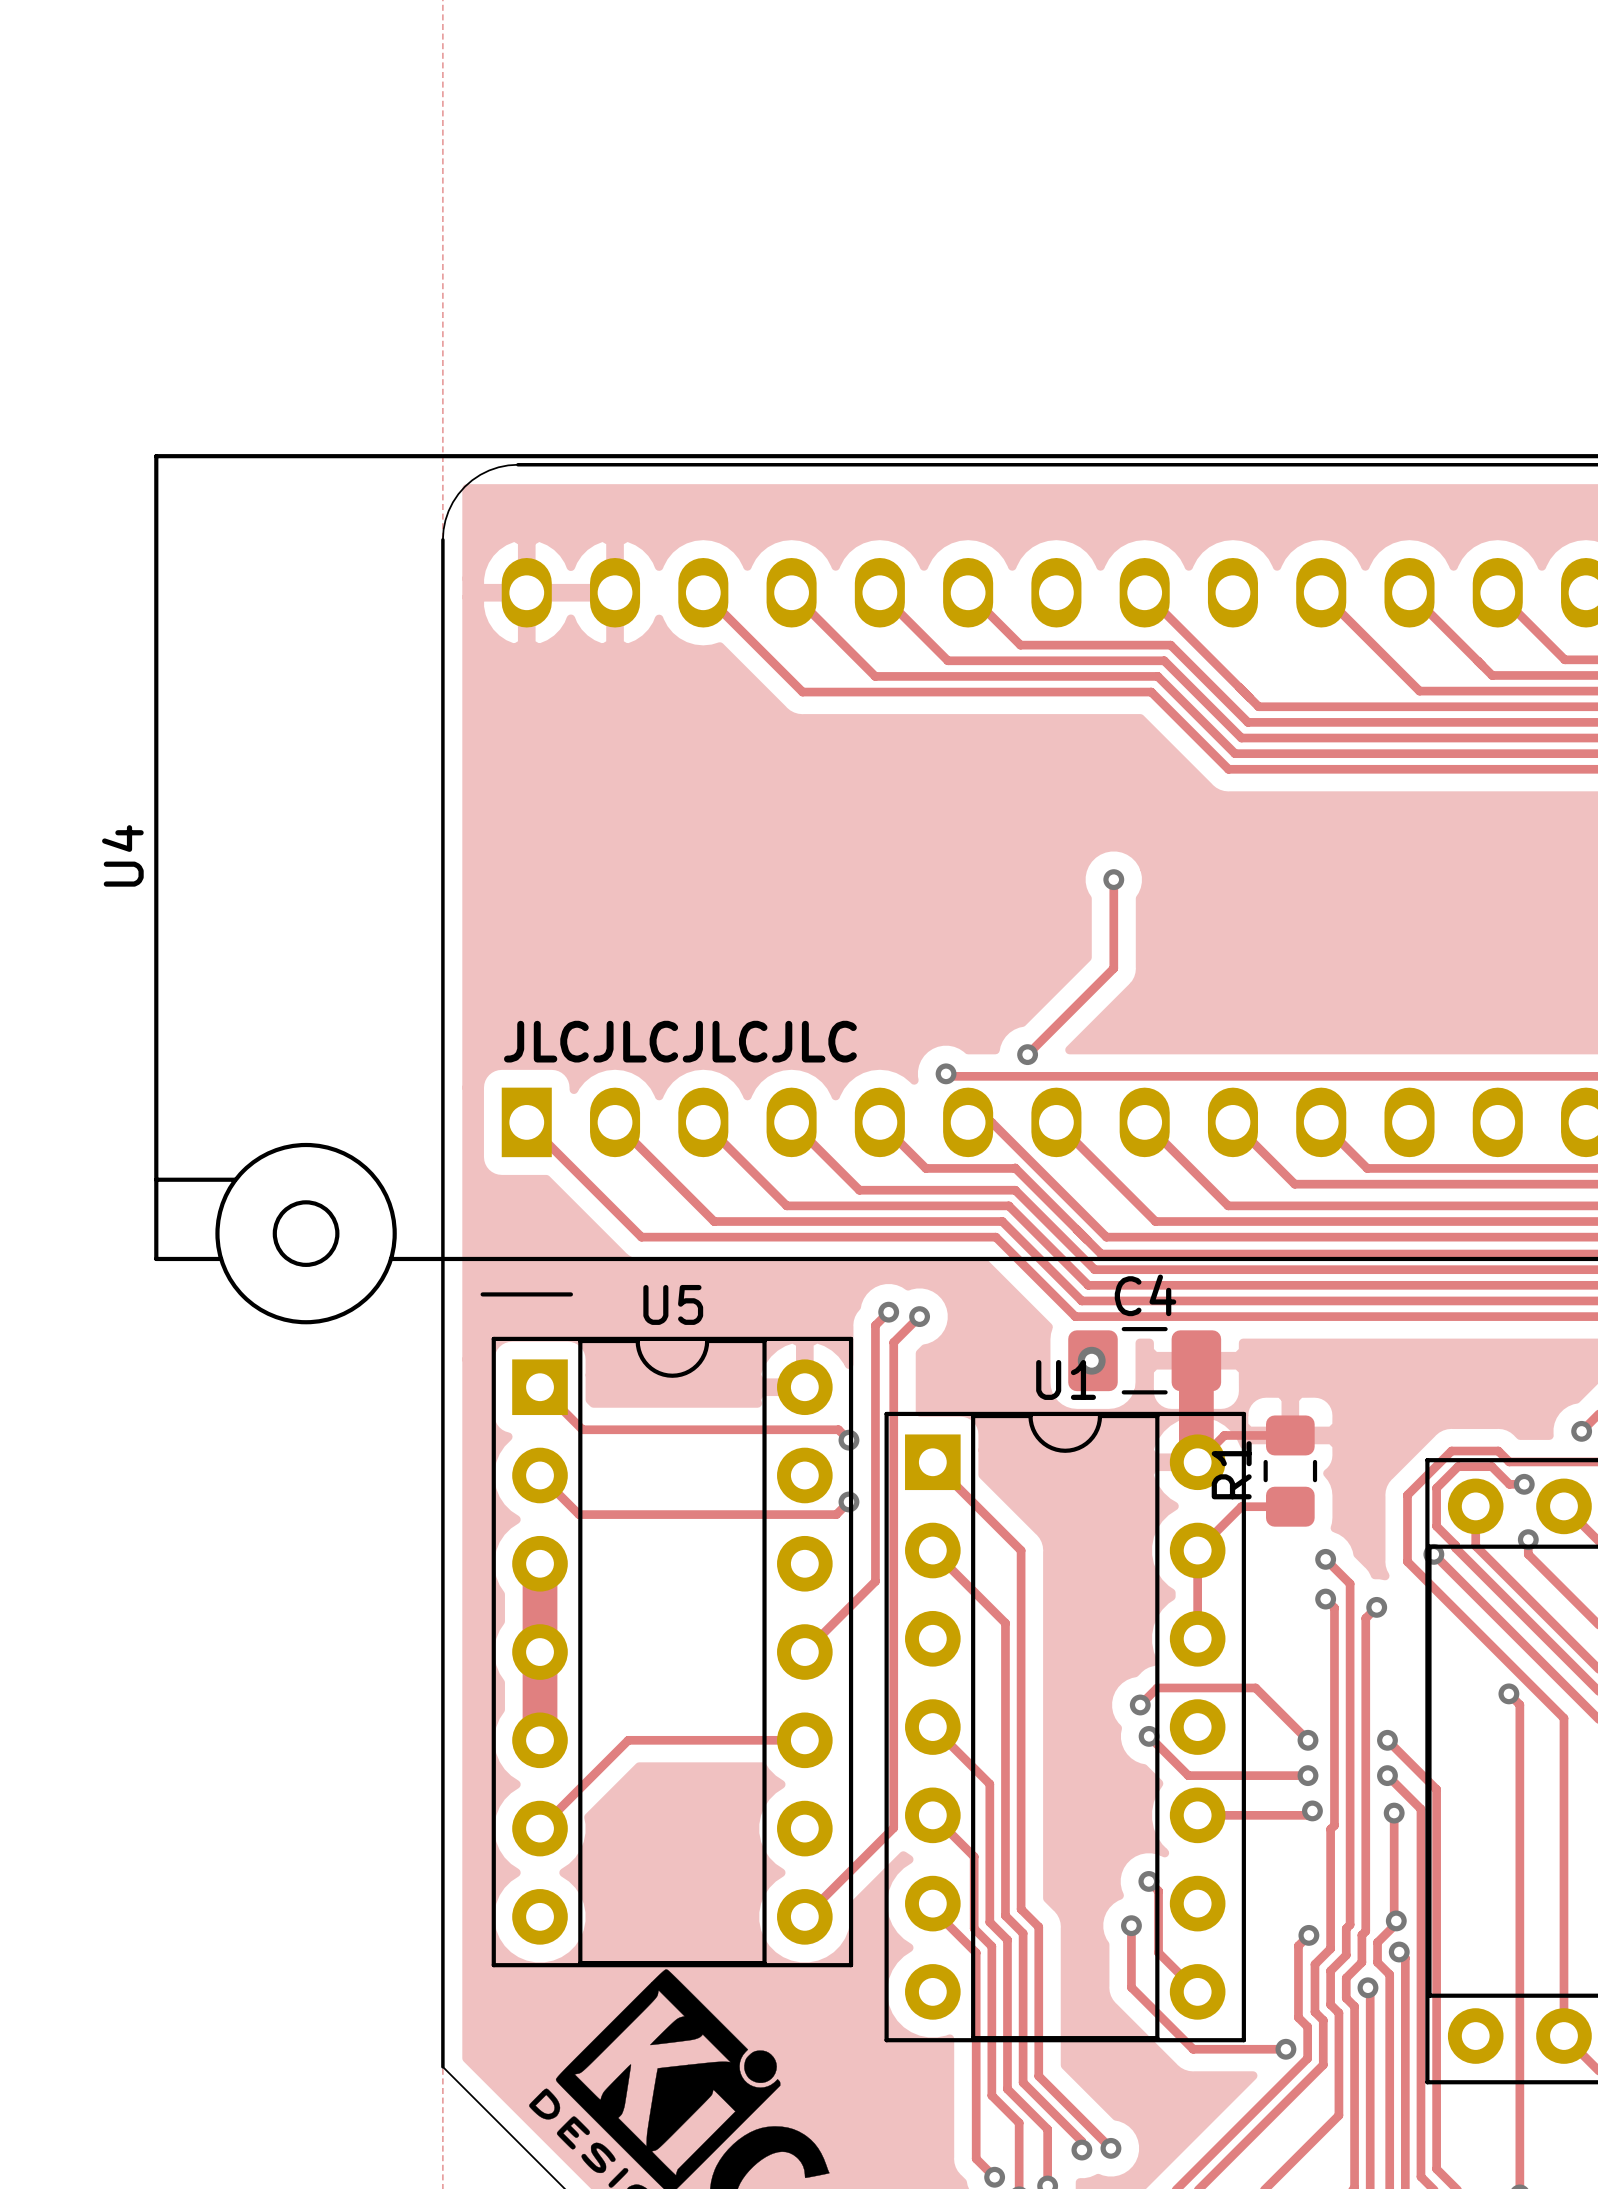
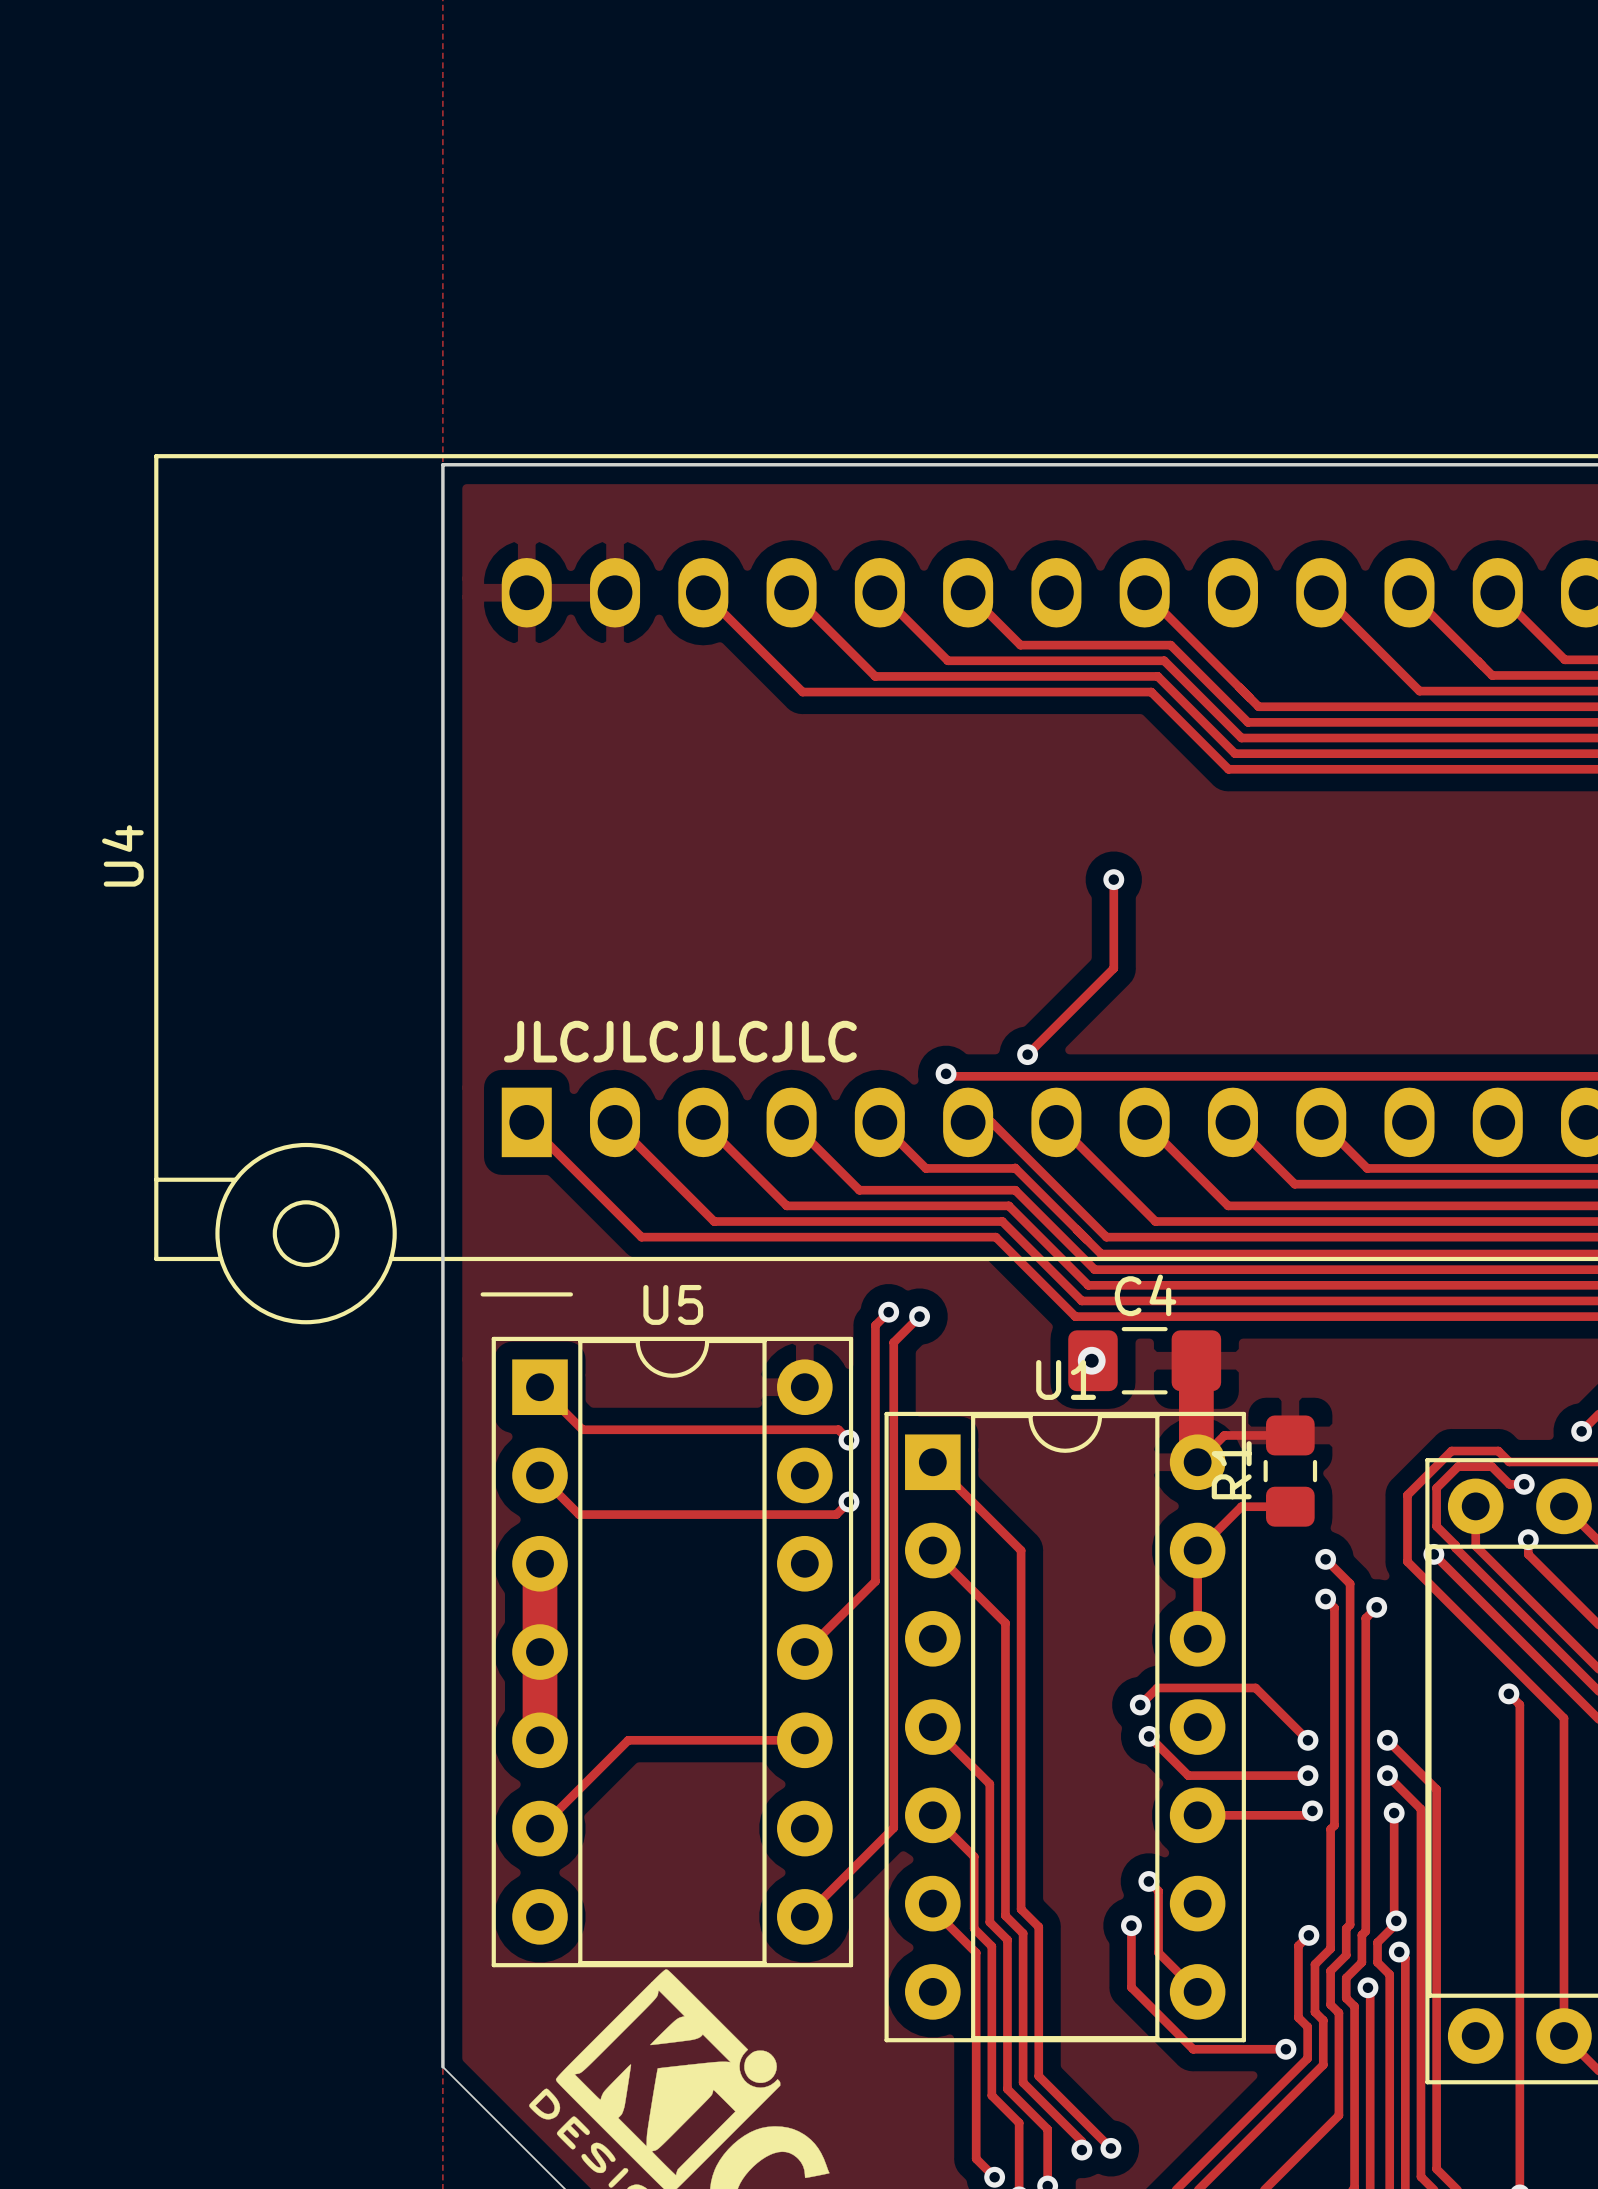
board edge: (517, 464) (489, 470) (464, 486) (448, 511) (442, 539) -> (517, 464) (442, 464) (442, 539)

